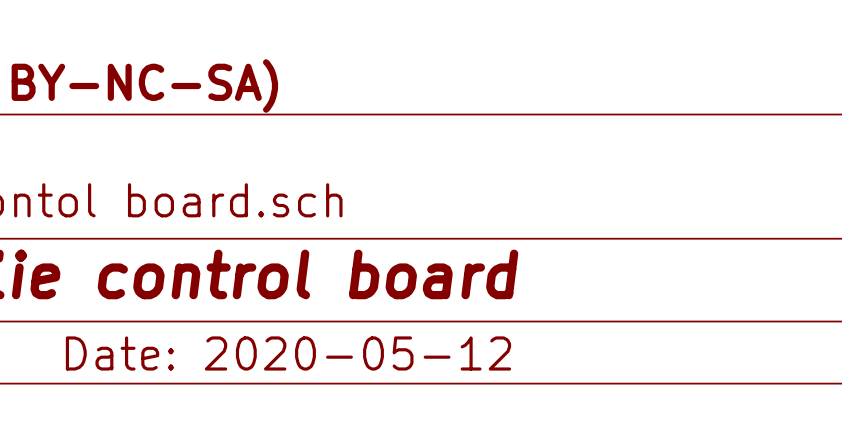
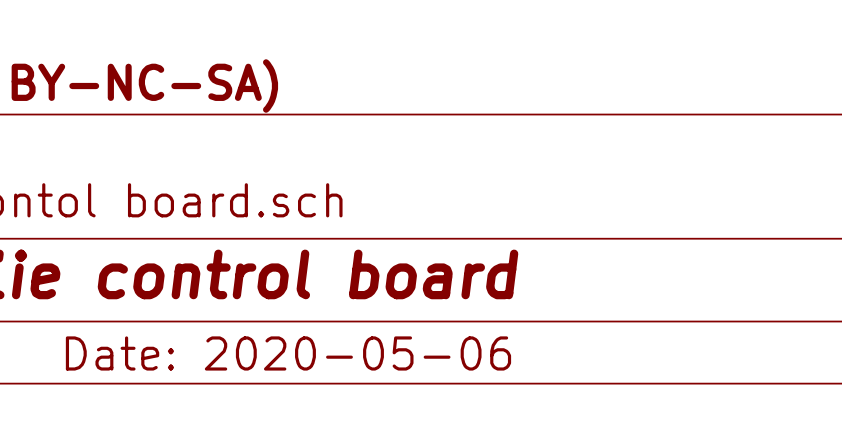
title block: Date: 2020-05-12 (288, 353) -> Date: 2020-05-06 (288, 353)

